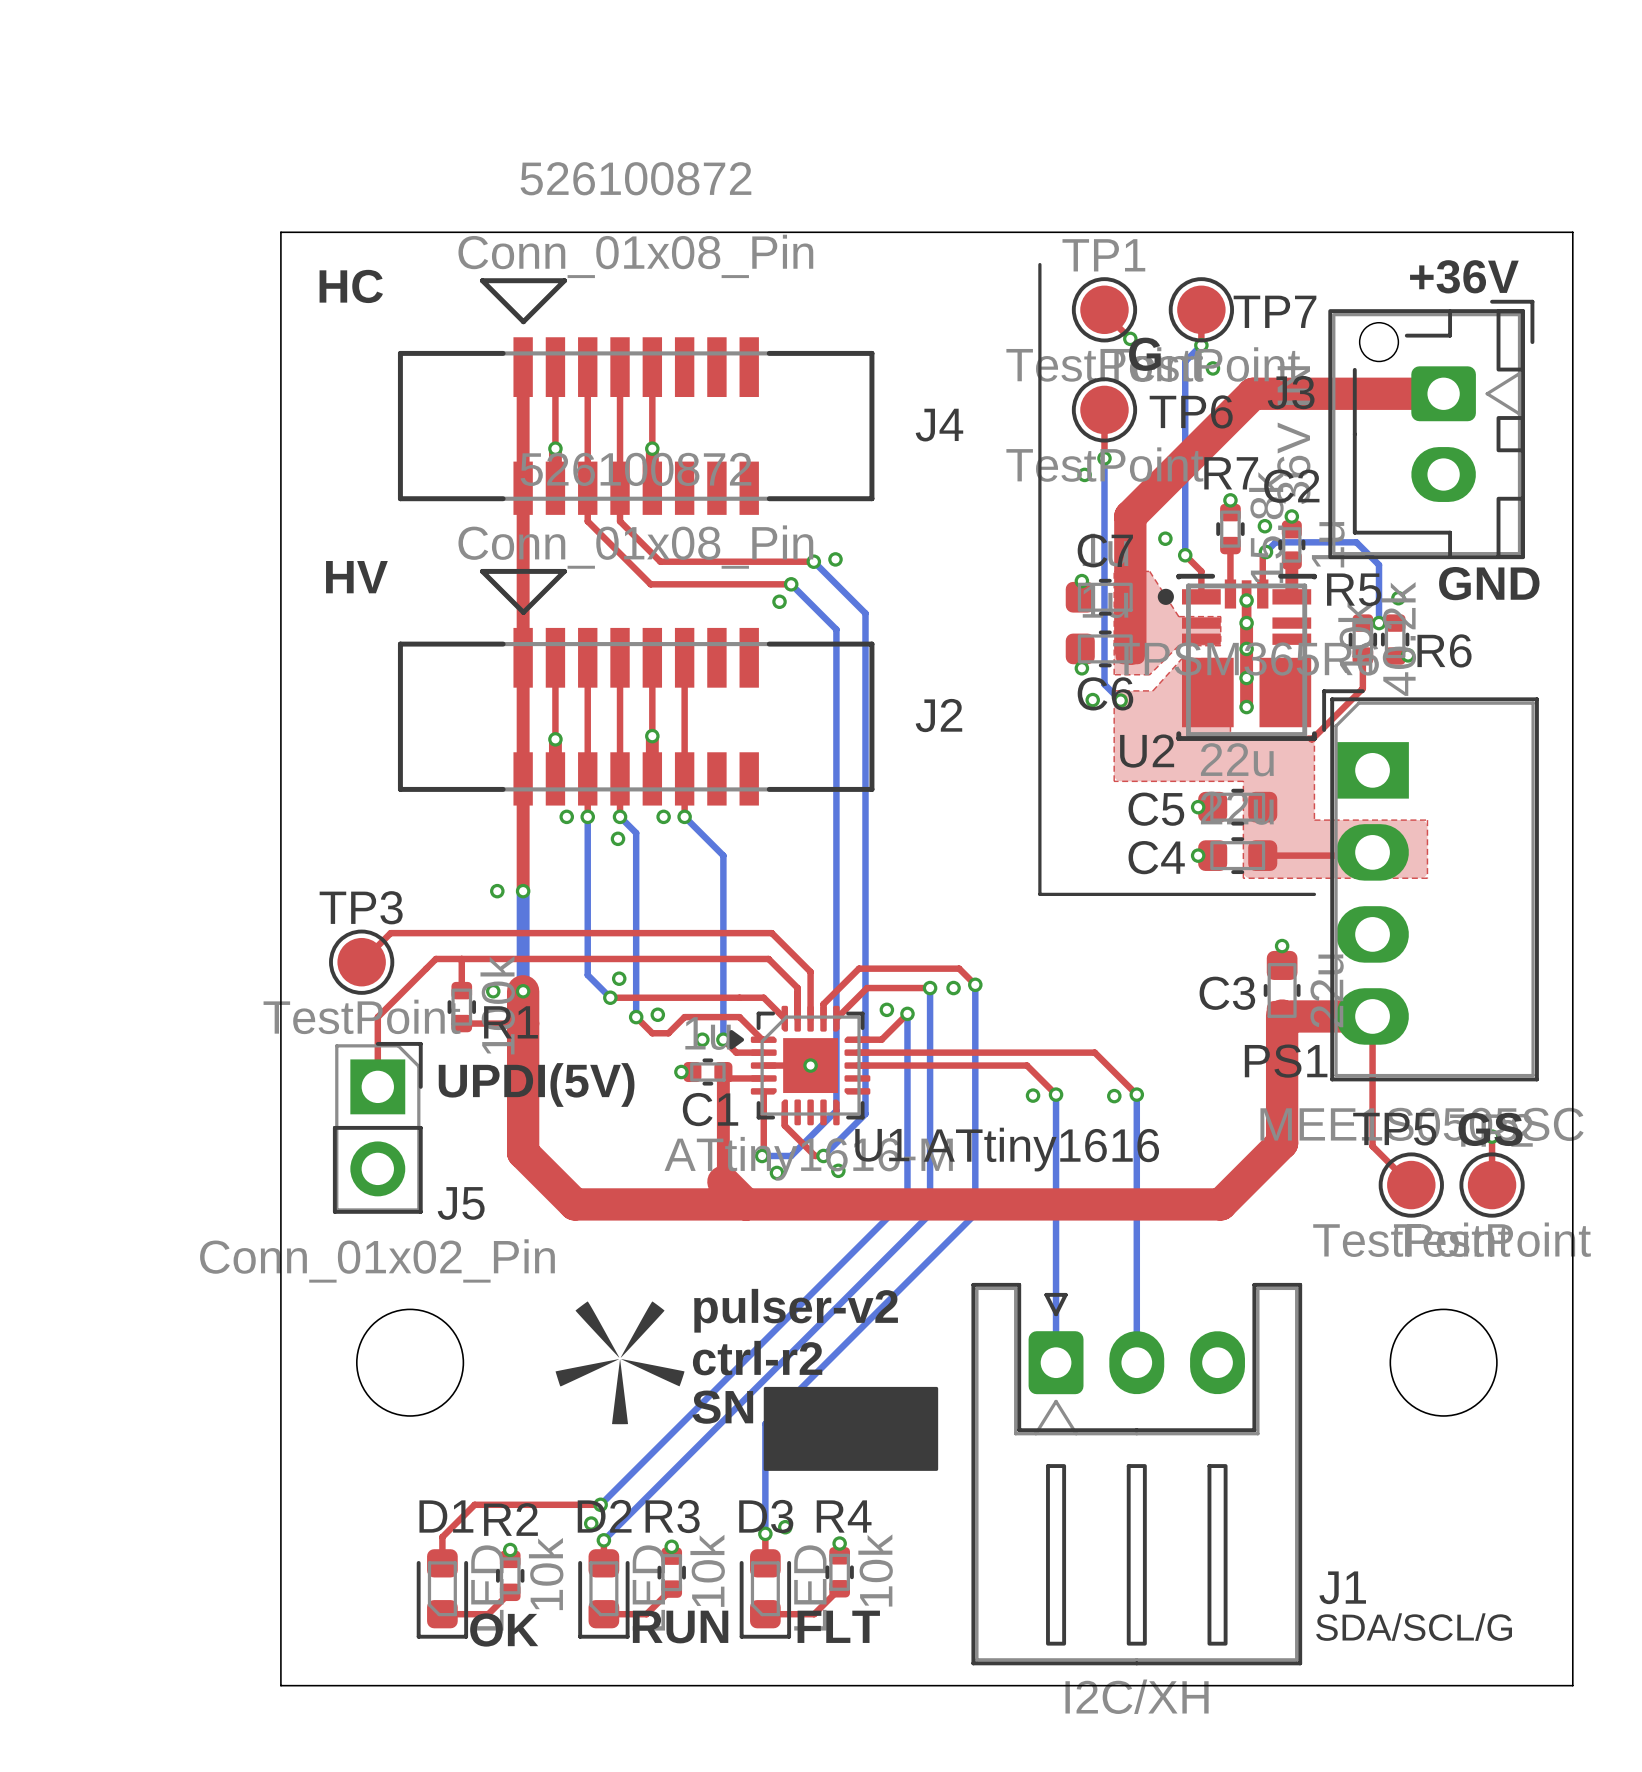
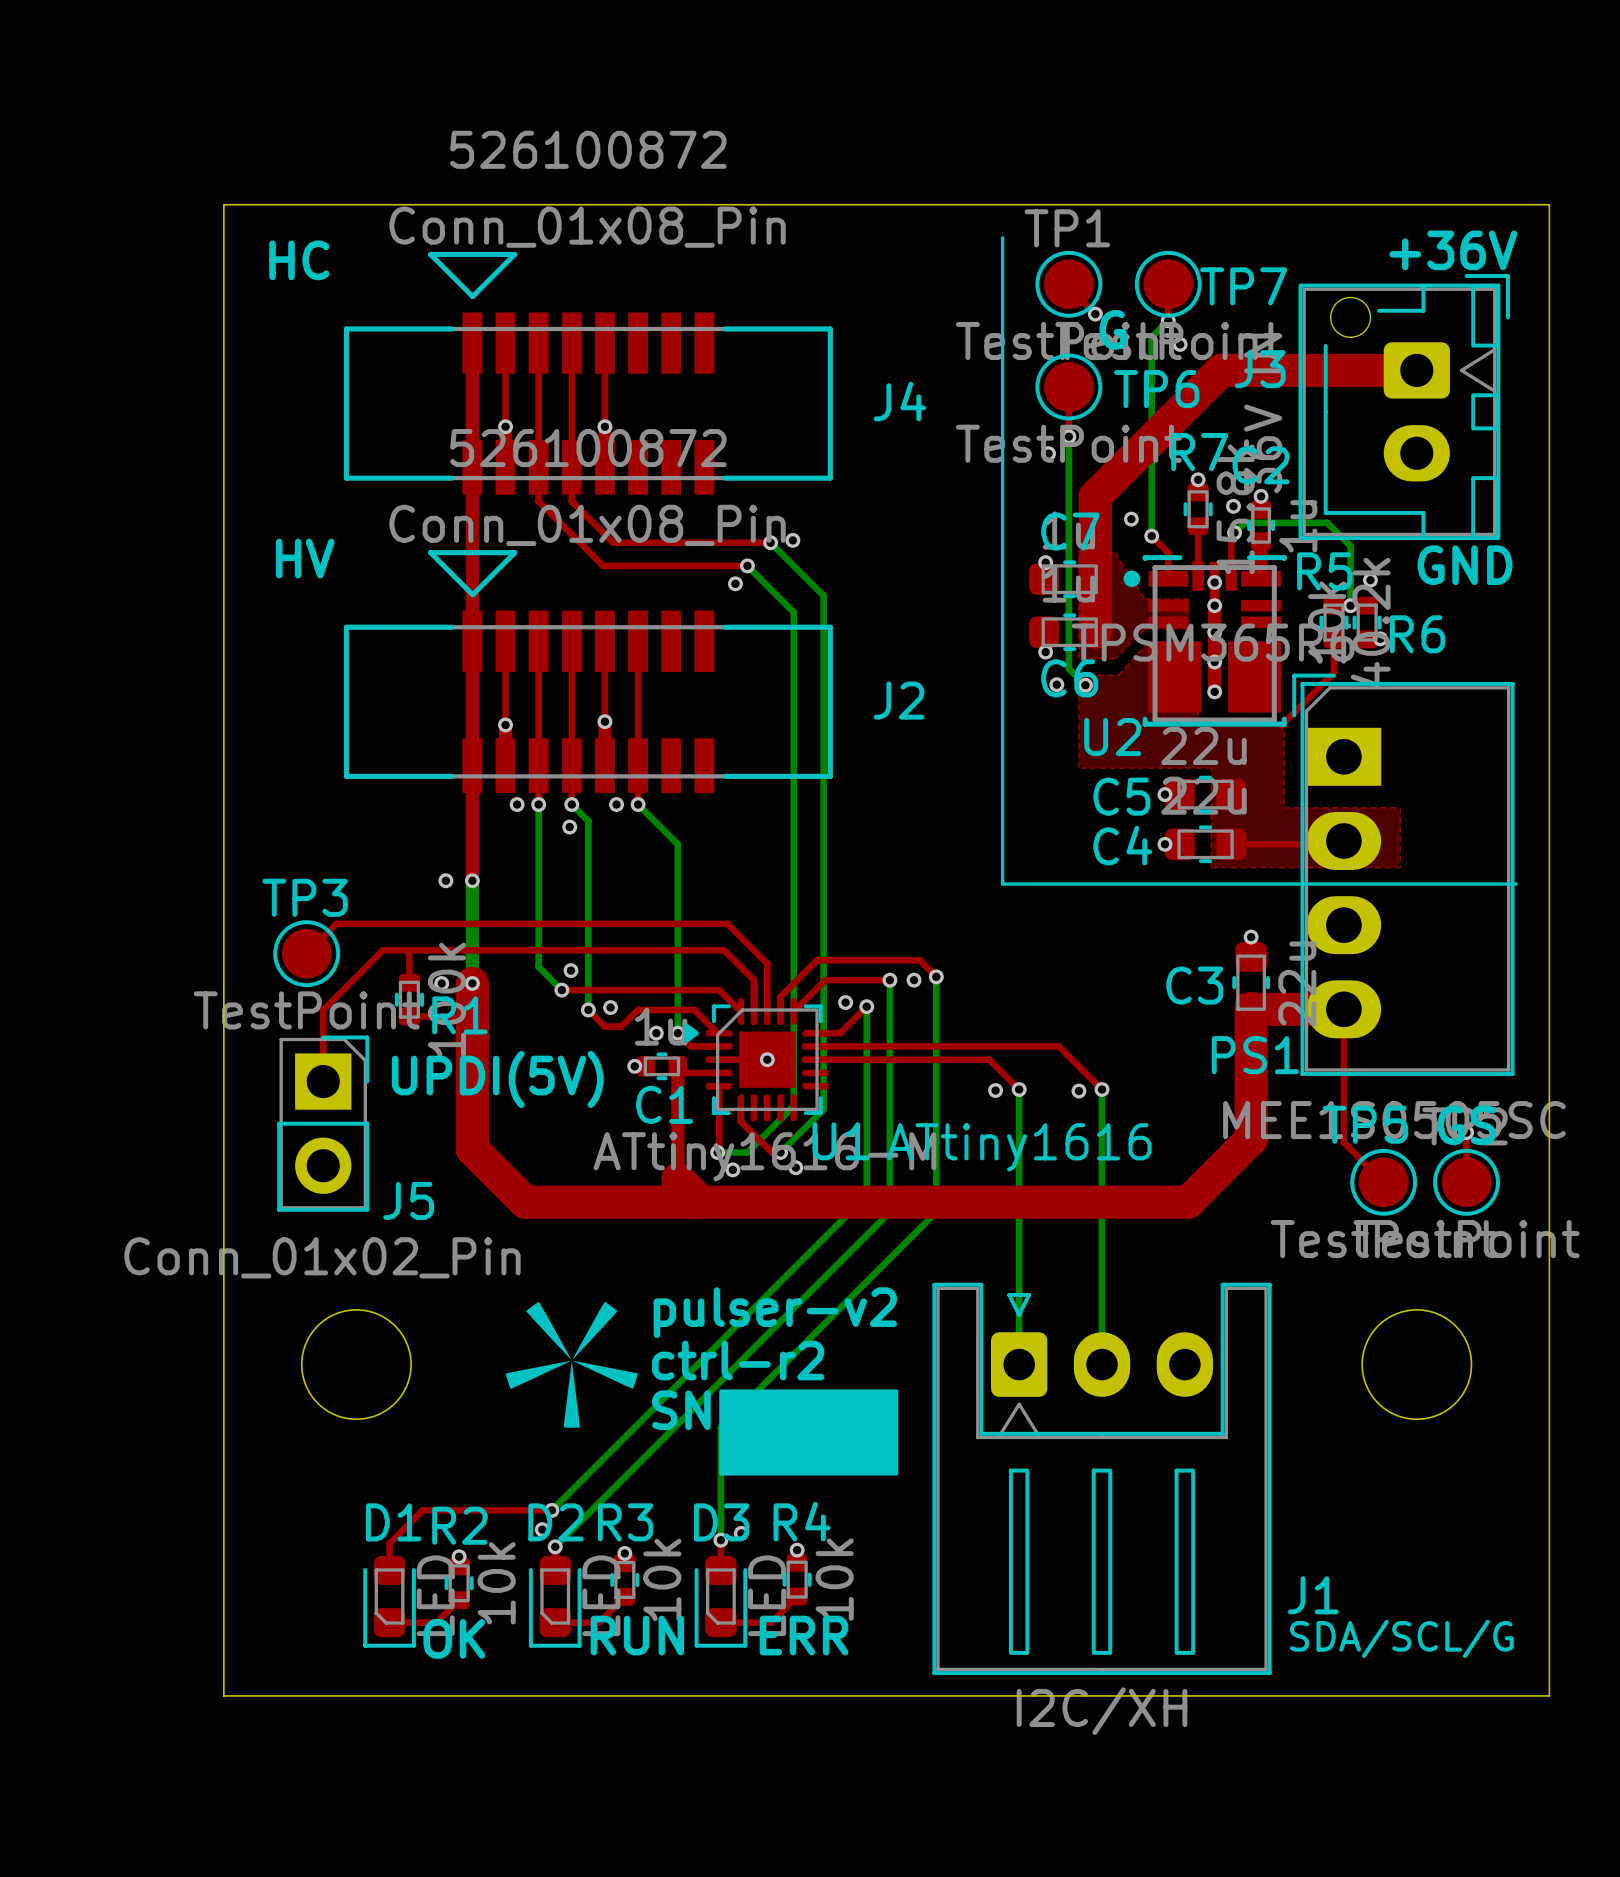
line: none -> (1284, 884) (1516, 884)
text: FLT (838, 1626) -> ERR (804, 1635)

